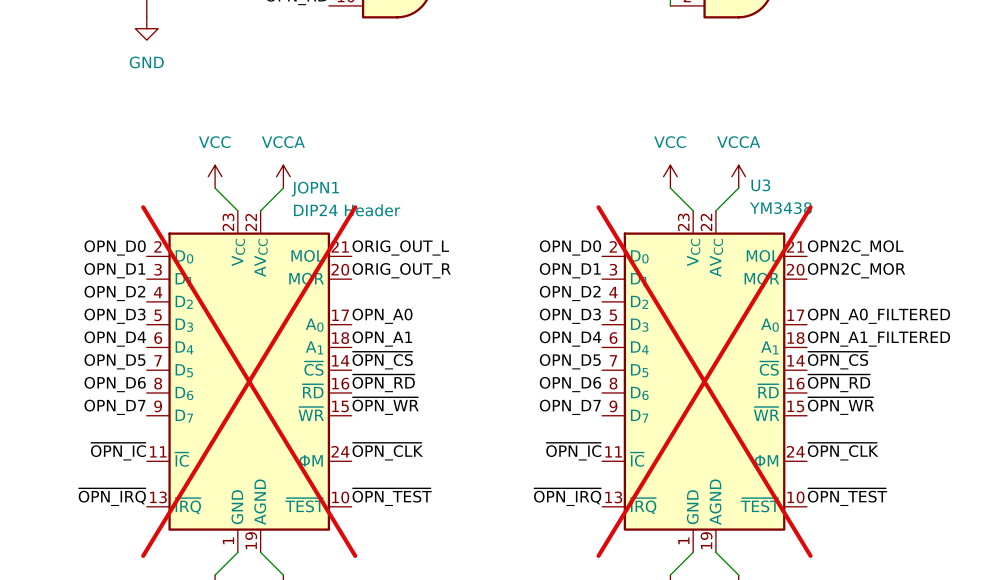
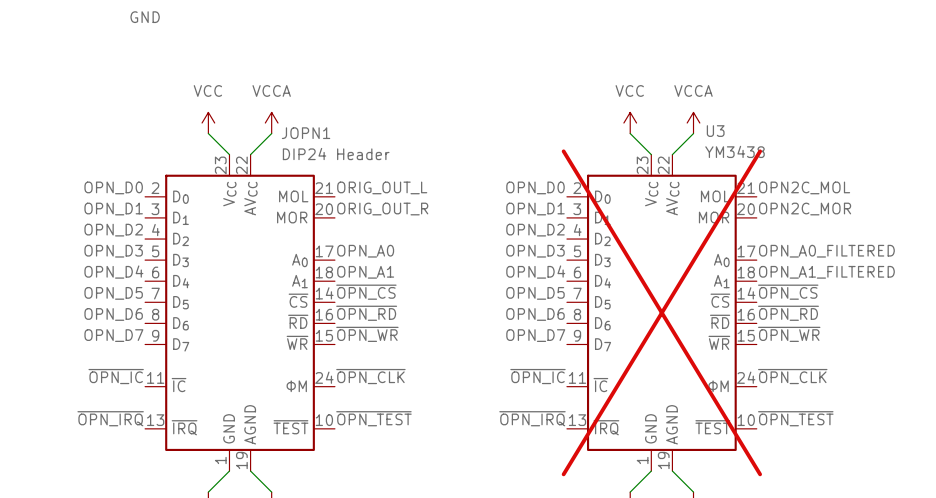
JOPN1 do-not-place cross: (249, 381) -> none

